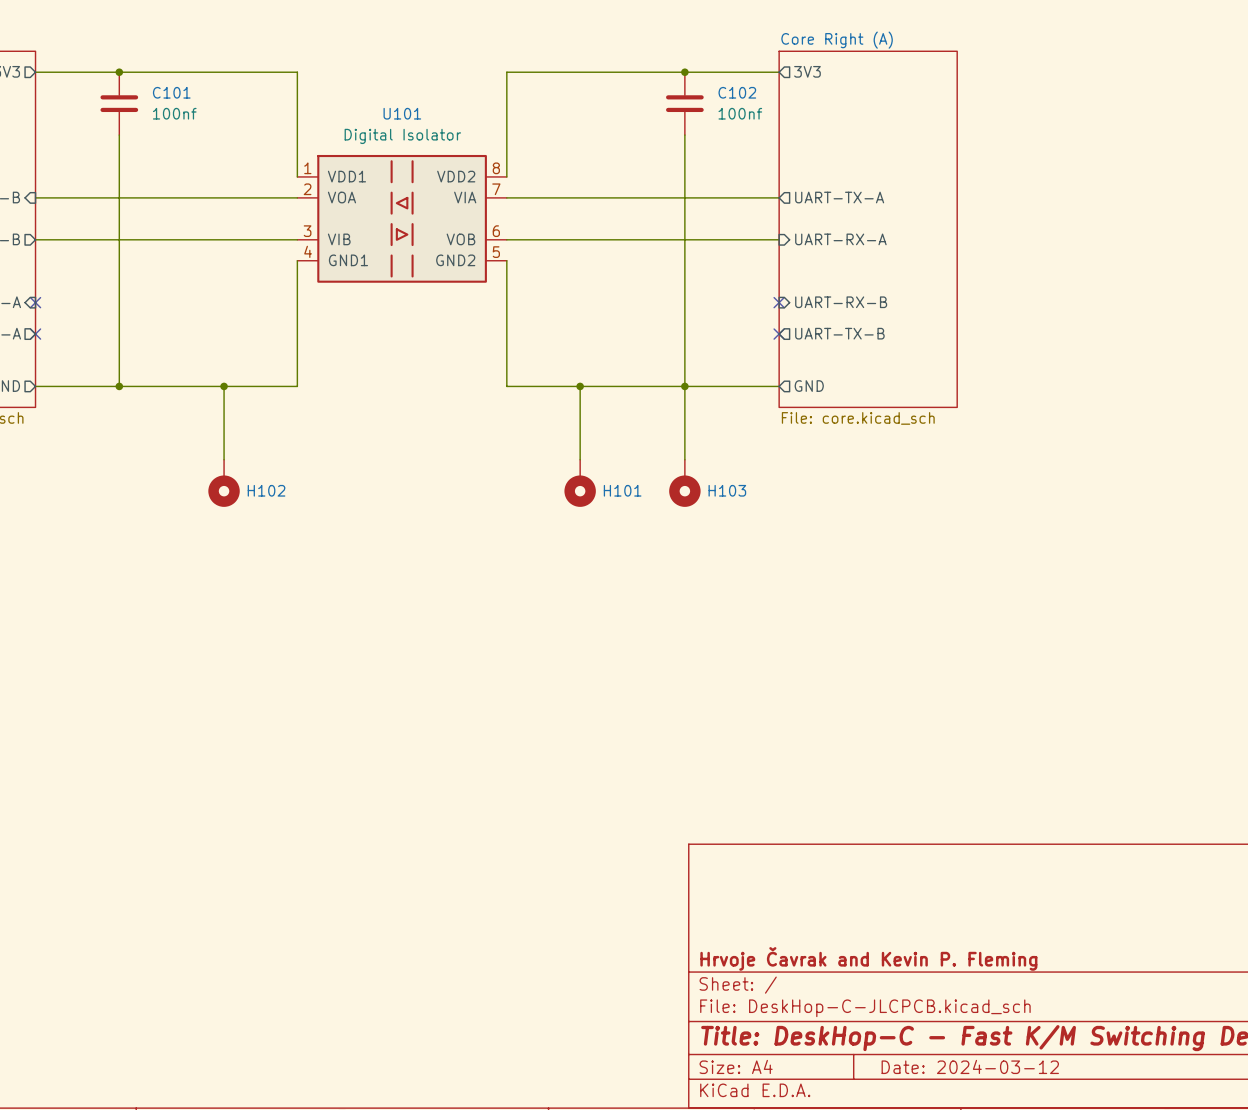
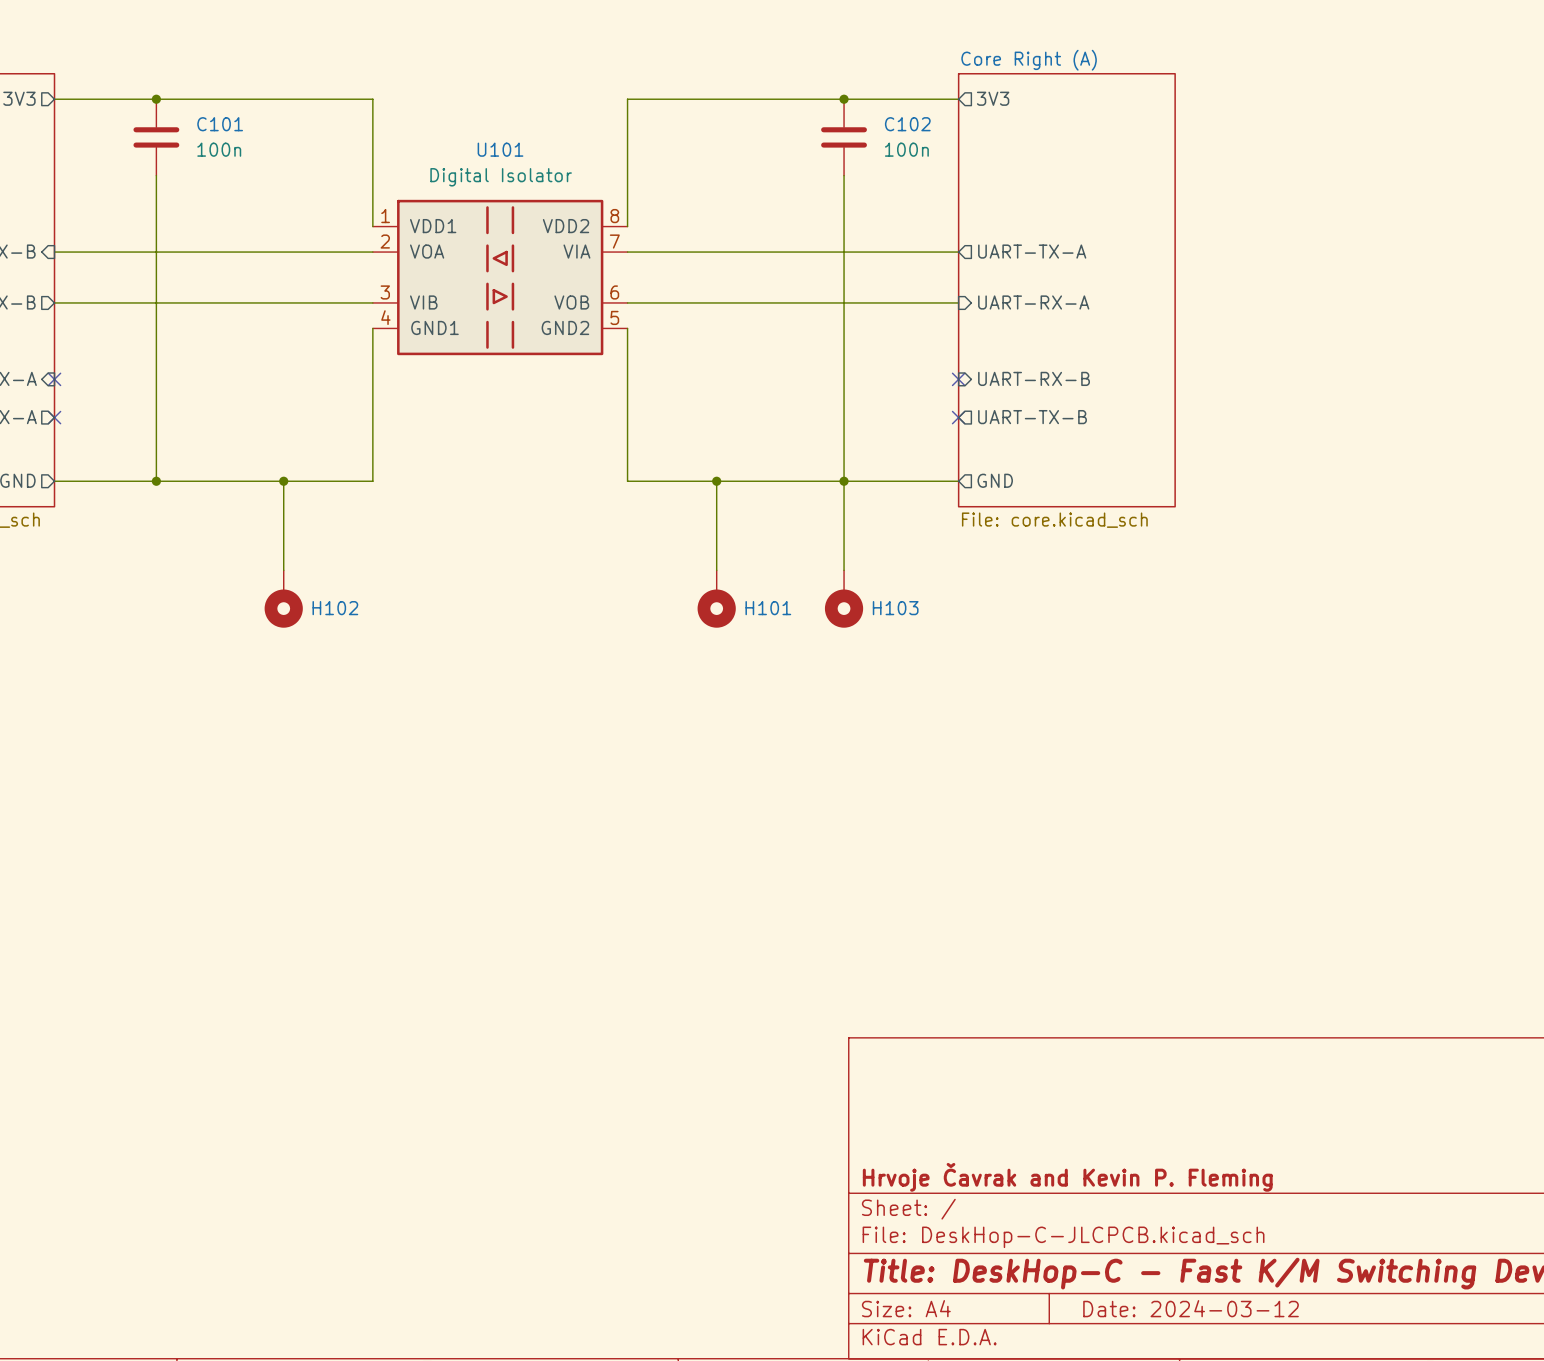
C101 value: 100nf (174, 113) -> 100n (219, 149)
C102 value: 100nf (740, 113) -> 100n (906, 149)

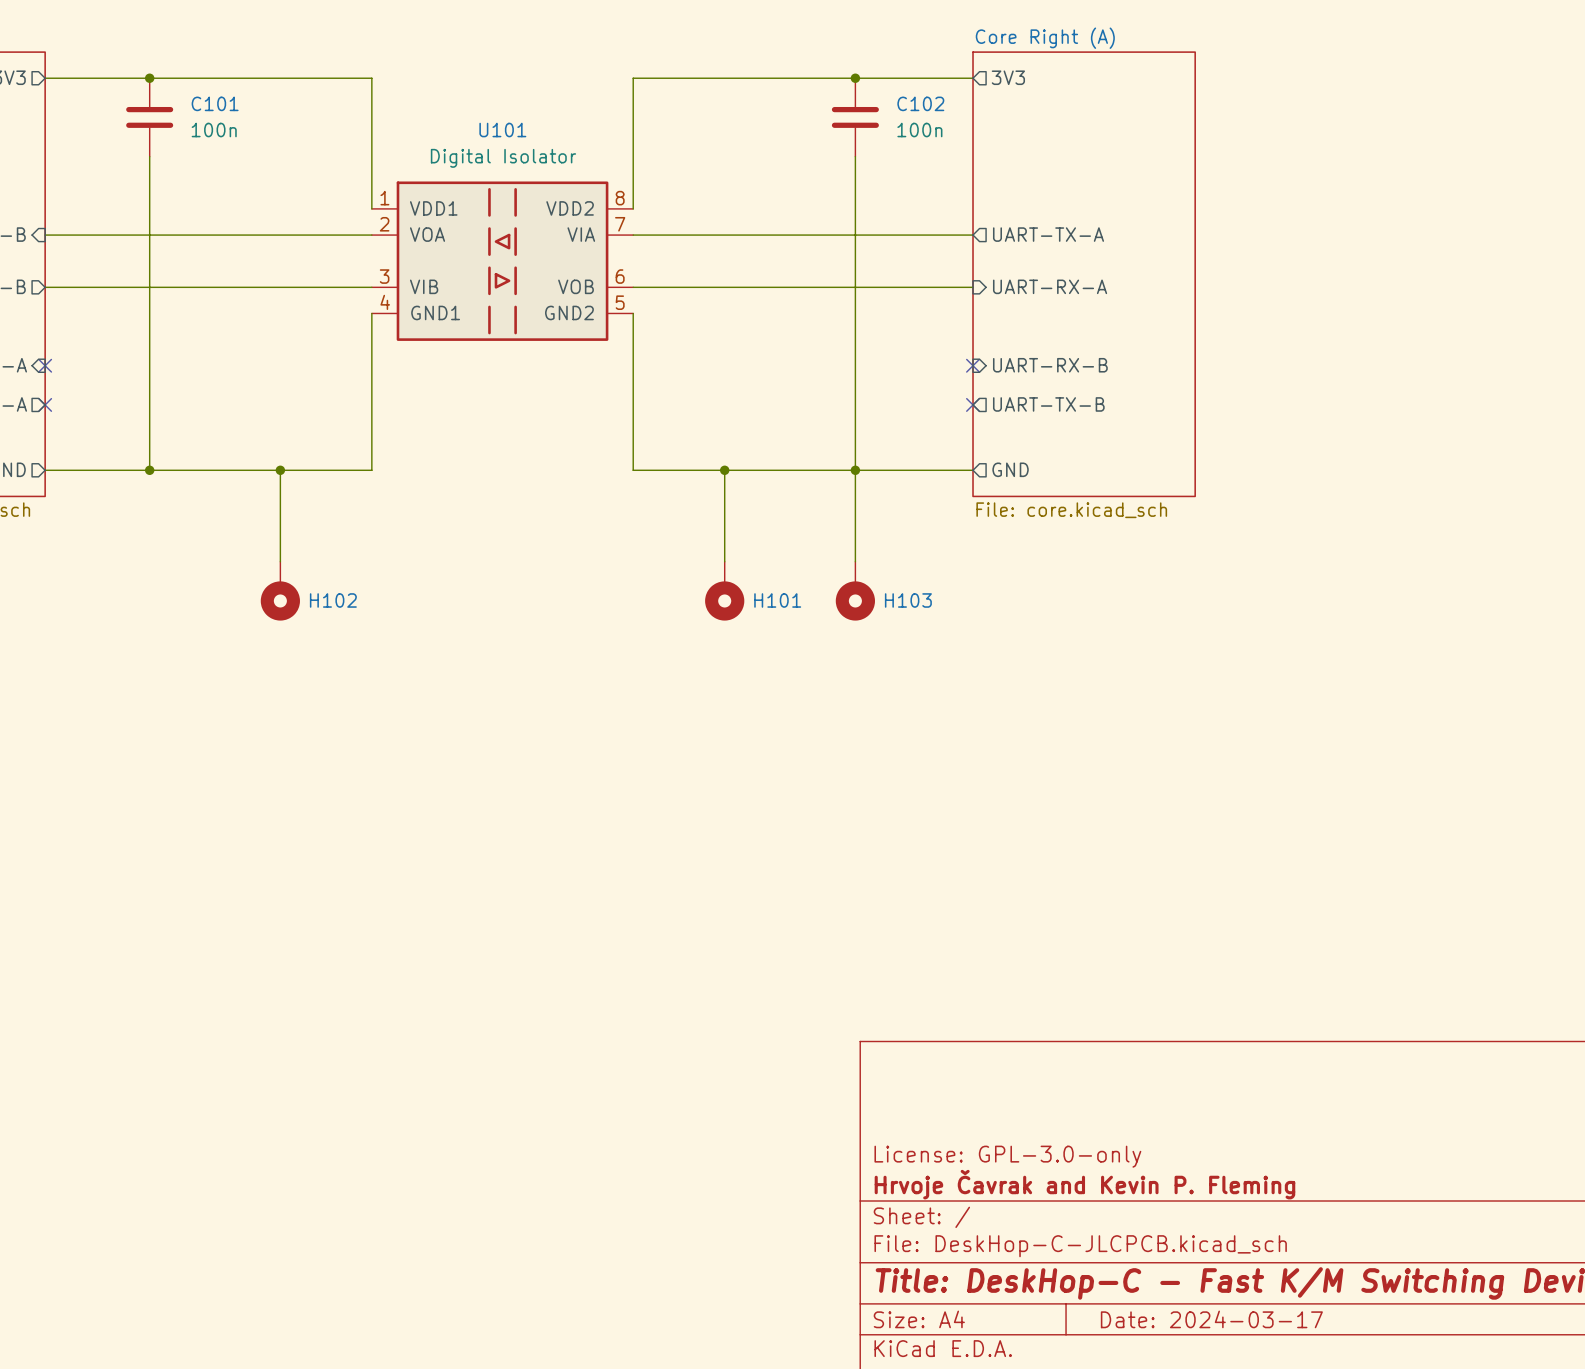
title block: none -> License: GPL-3.0-only (1007, 1156)
title block: Date: 2024-03-12 (1191, 1308) -> Date: 2024-03-17 (1211, 1319)

